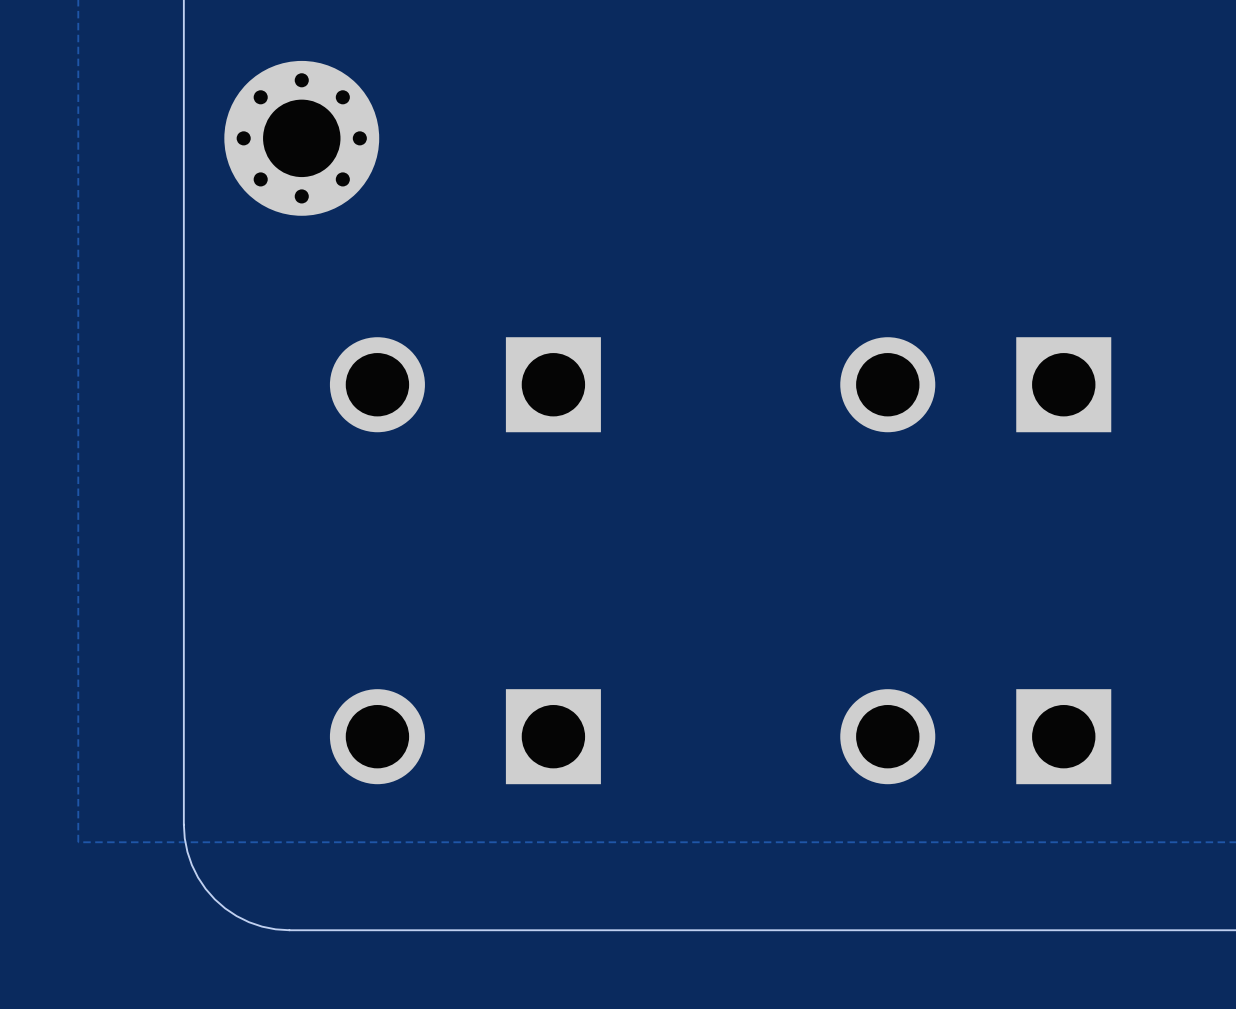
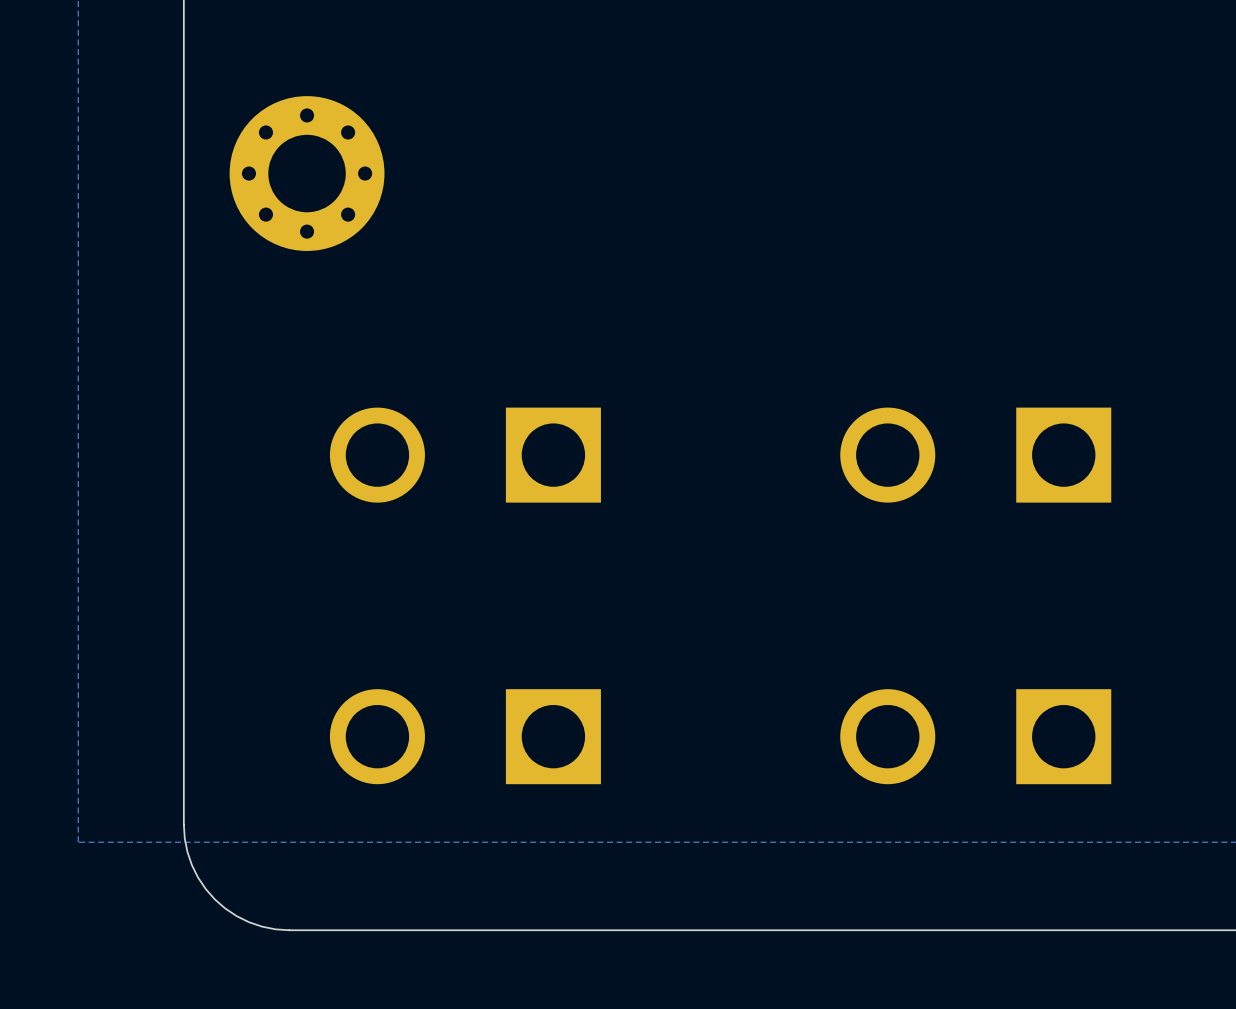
part position: (301, 138) -> (307, 173)
part position: (465, 384) -> (465, 455)
part position: (975, 384) -> (975, 455)

